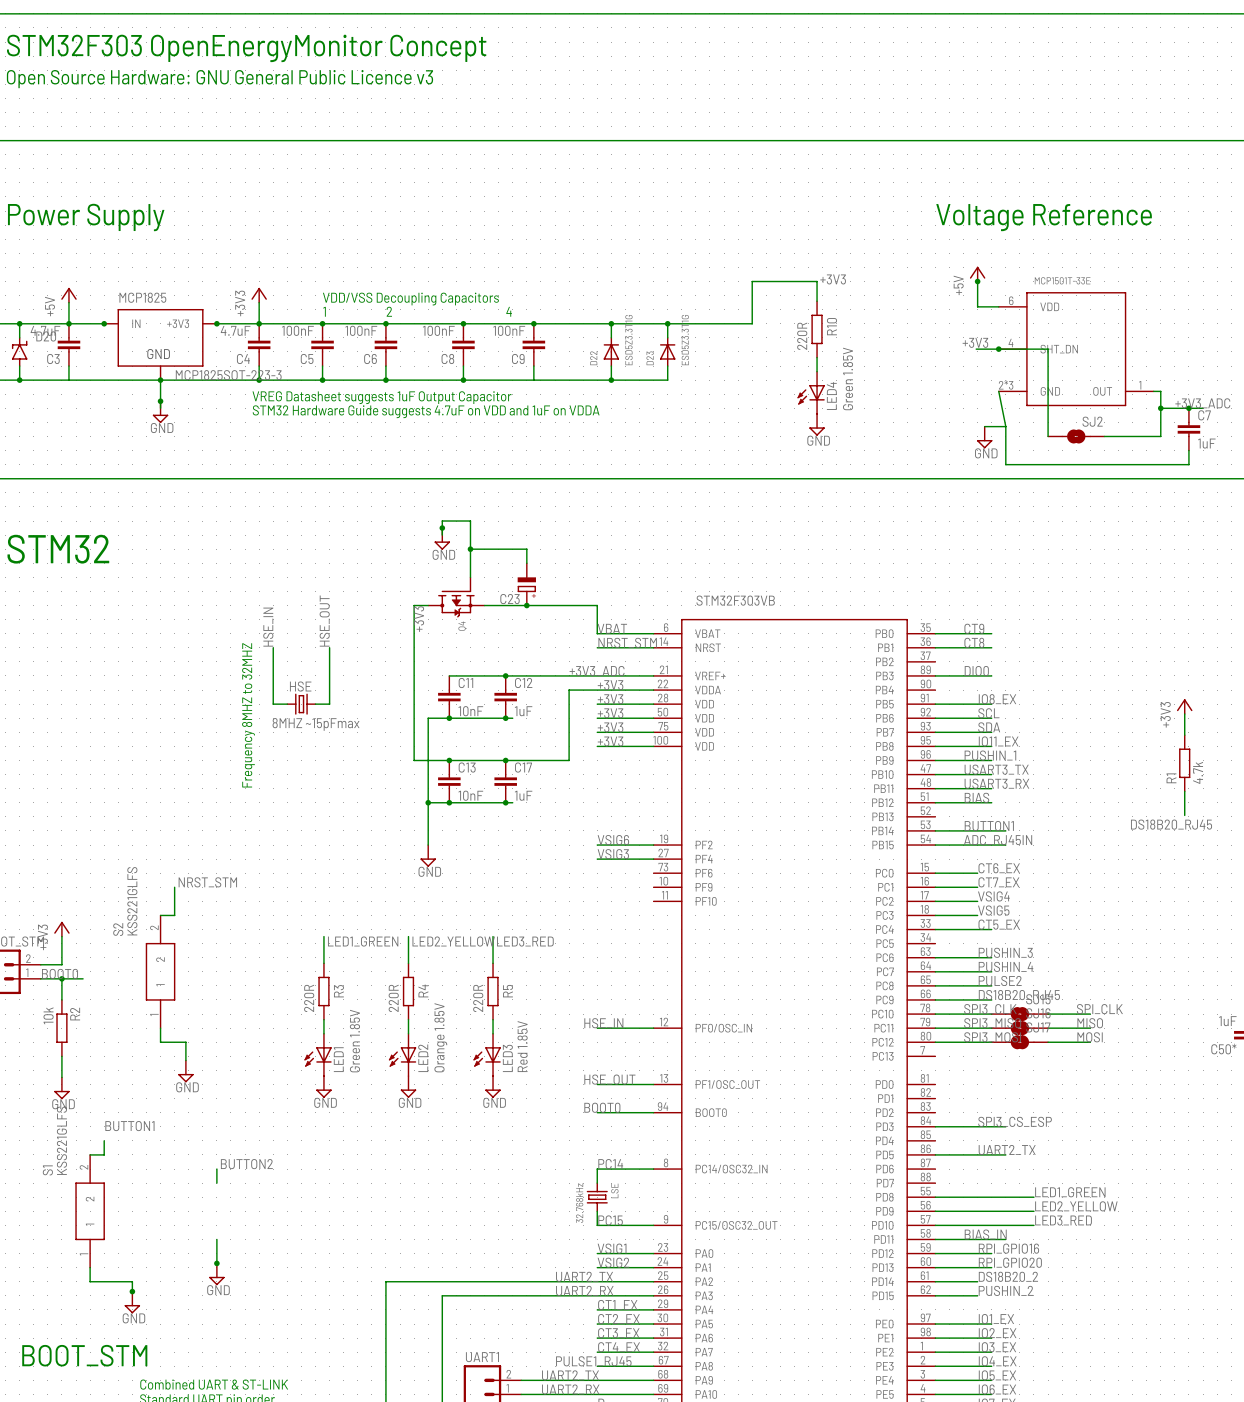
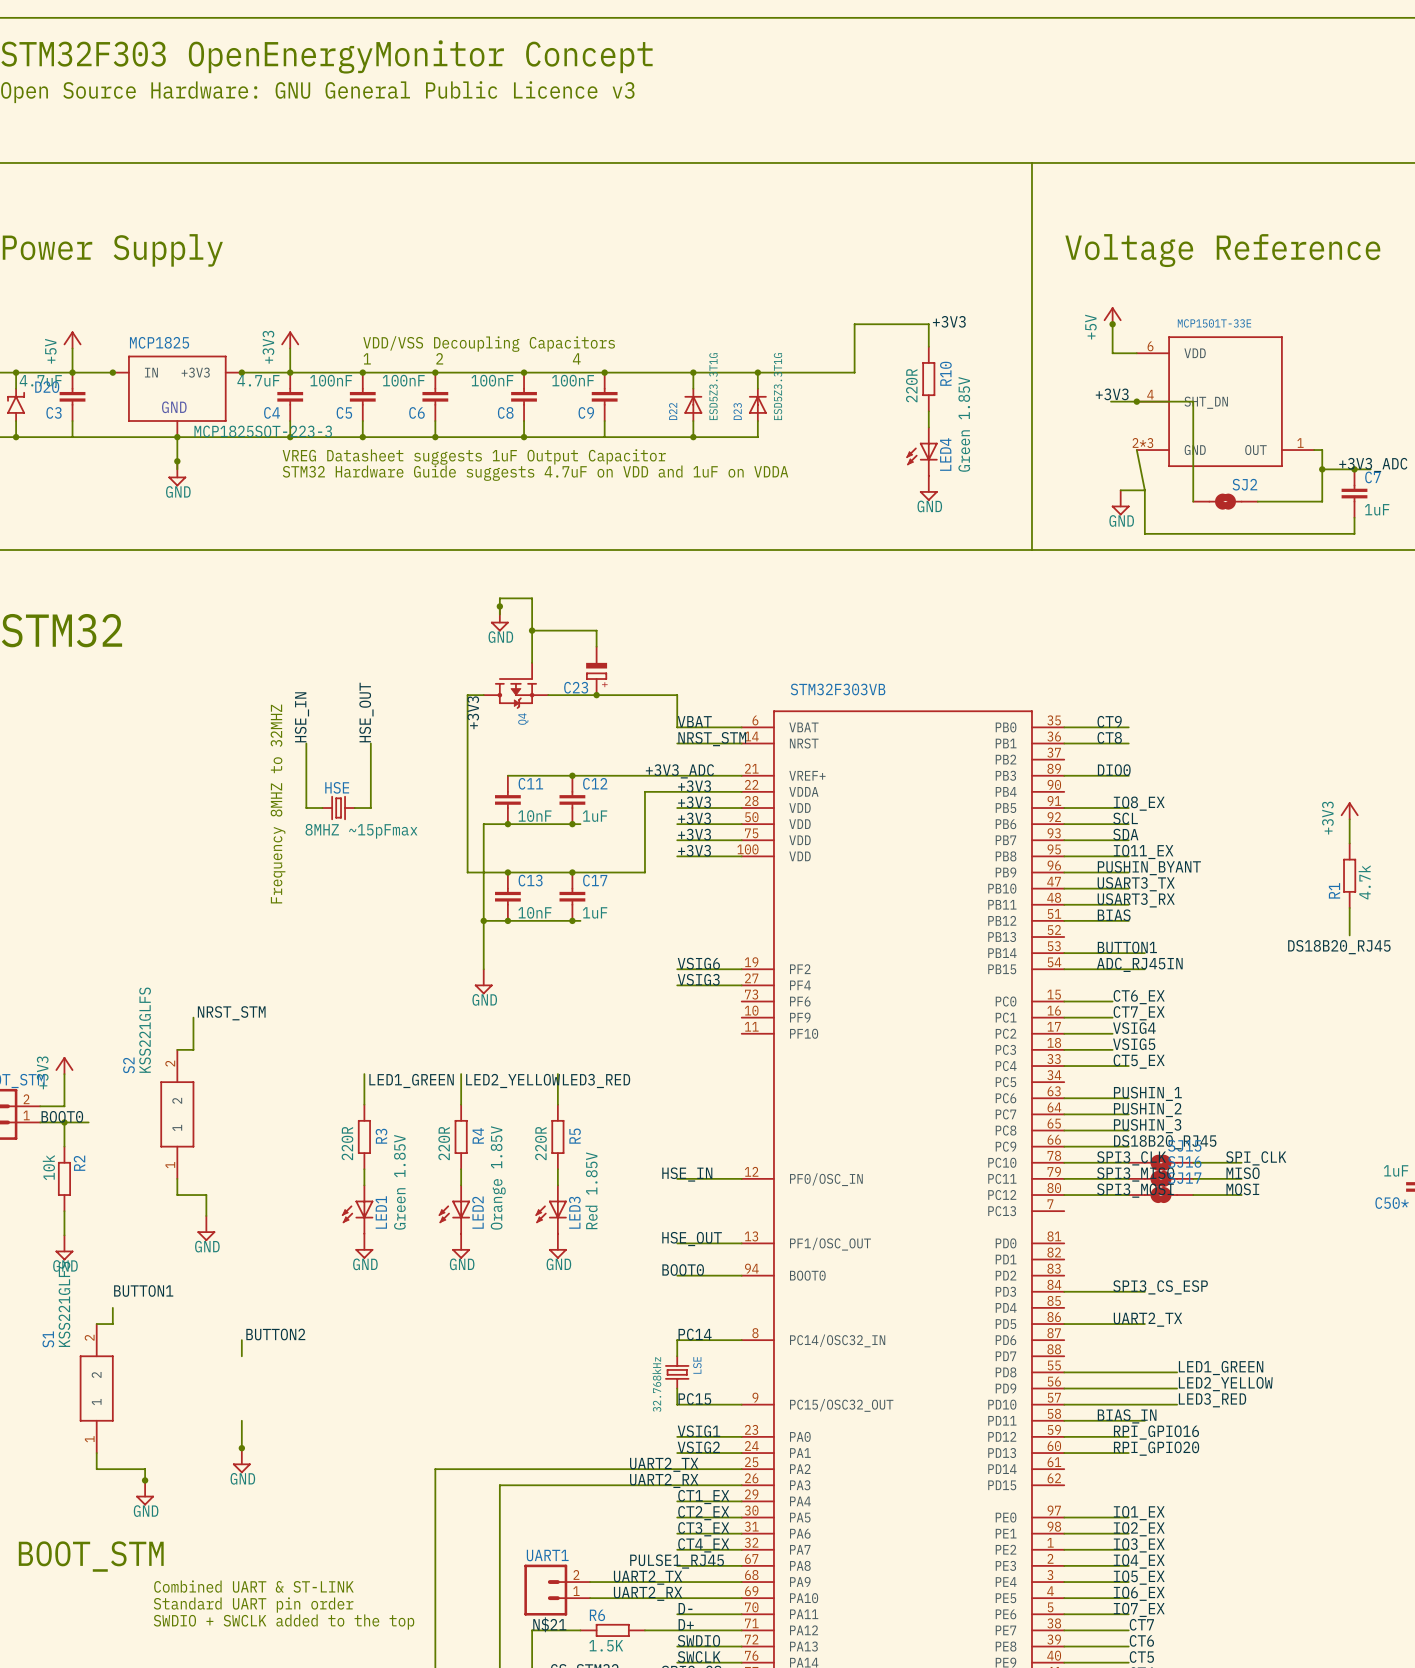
wire: none -> (1031, 162) (1031, 550)
label: PUSHIN_1 (990, 755) -> PUSHIN_BYANT (1149, 868)
label: PUSHIN_3 (1005, 952) -> PUSHIN_1 (1147, 1093)
label: PUSHIN_4 (1005, 966) -> PUSHIN_2 (1147, 1110)
label: PULSE2 (1000, 980) -> PUSHIN_3 (1147, 1126)
label: DS18B20_2 (1008, 1276) -> none
wire: (935, 1281) (977, 1281) -> none
label: PUSHIN_2 (1005, 1290) -> none
wire: (935, 1295) (977, 1295) -> none

